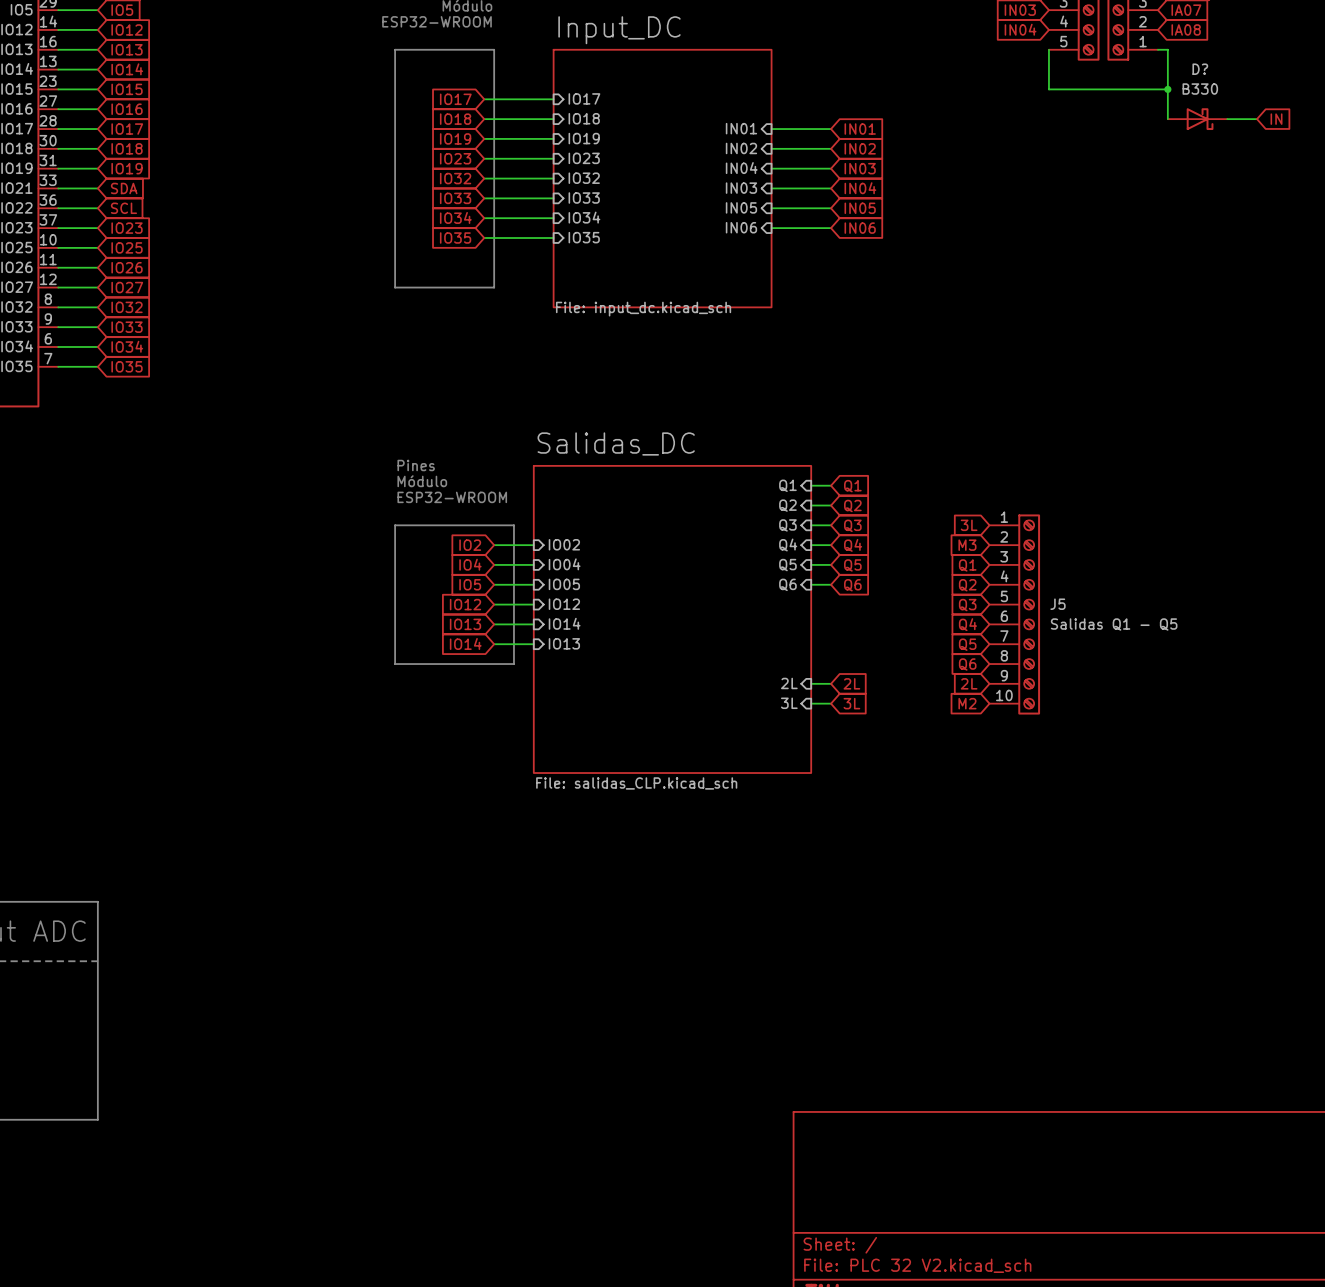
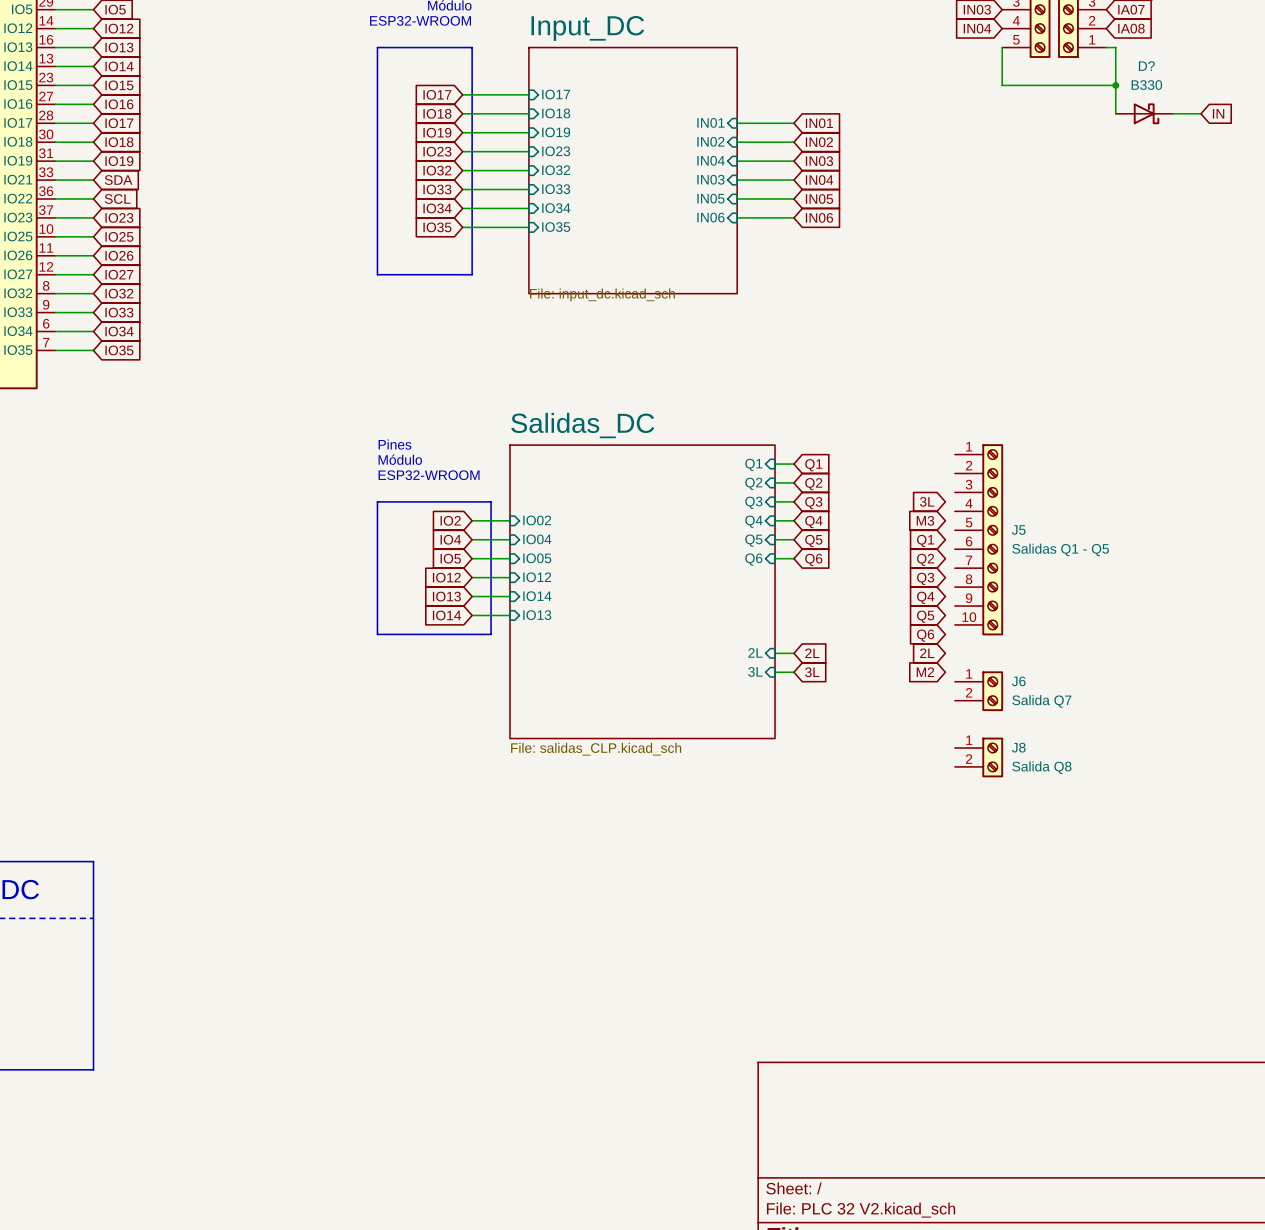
J5 position: (1014, 614) -> (979, 539)
J6: none -> Salida Q7 (979, 691)
J8: none -> Salida Q8 (979, 757)

